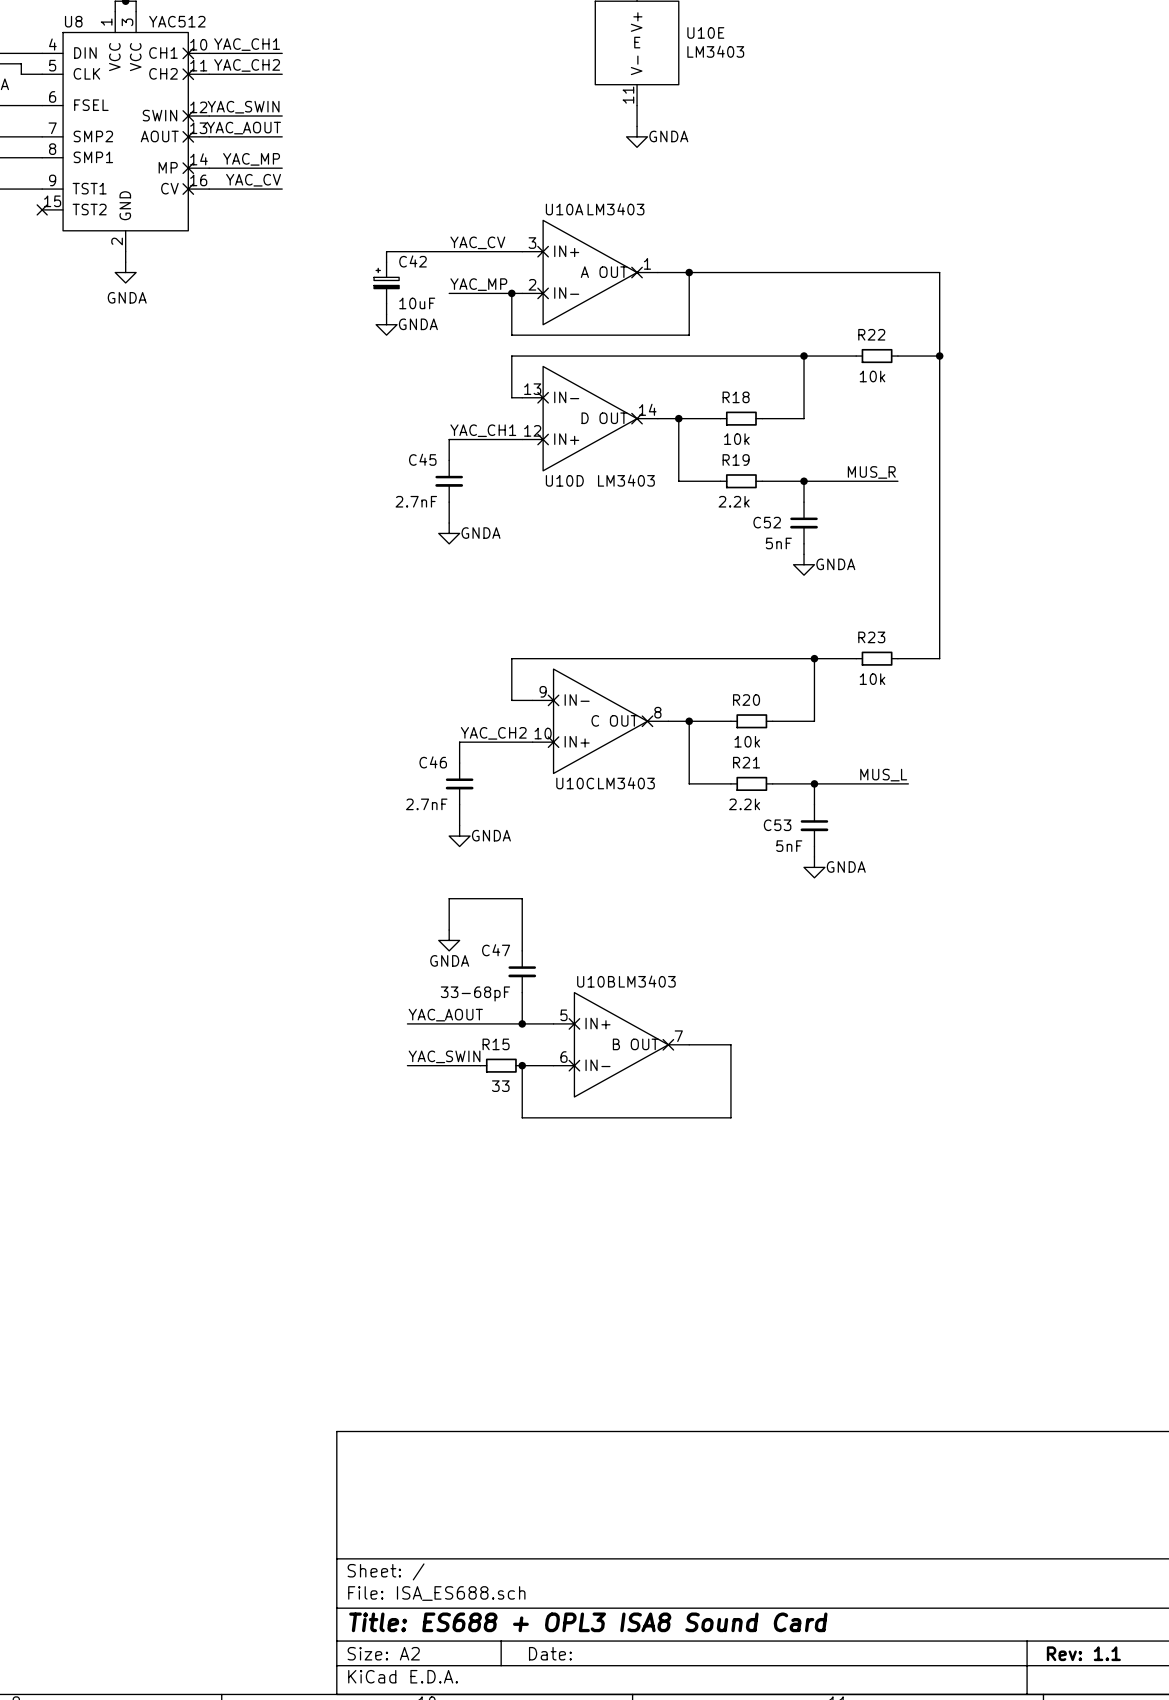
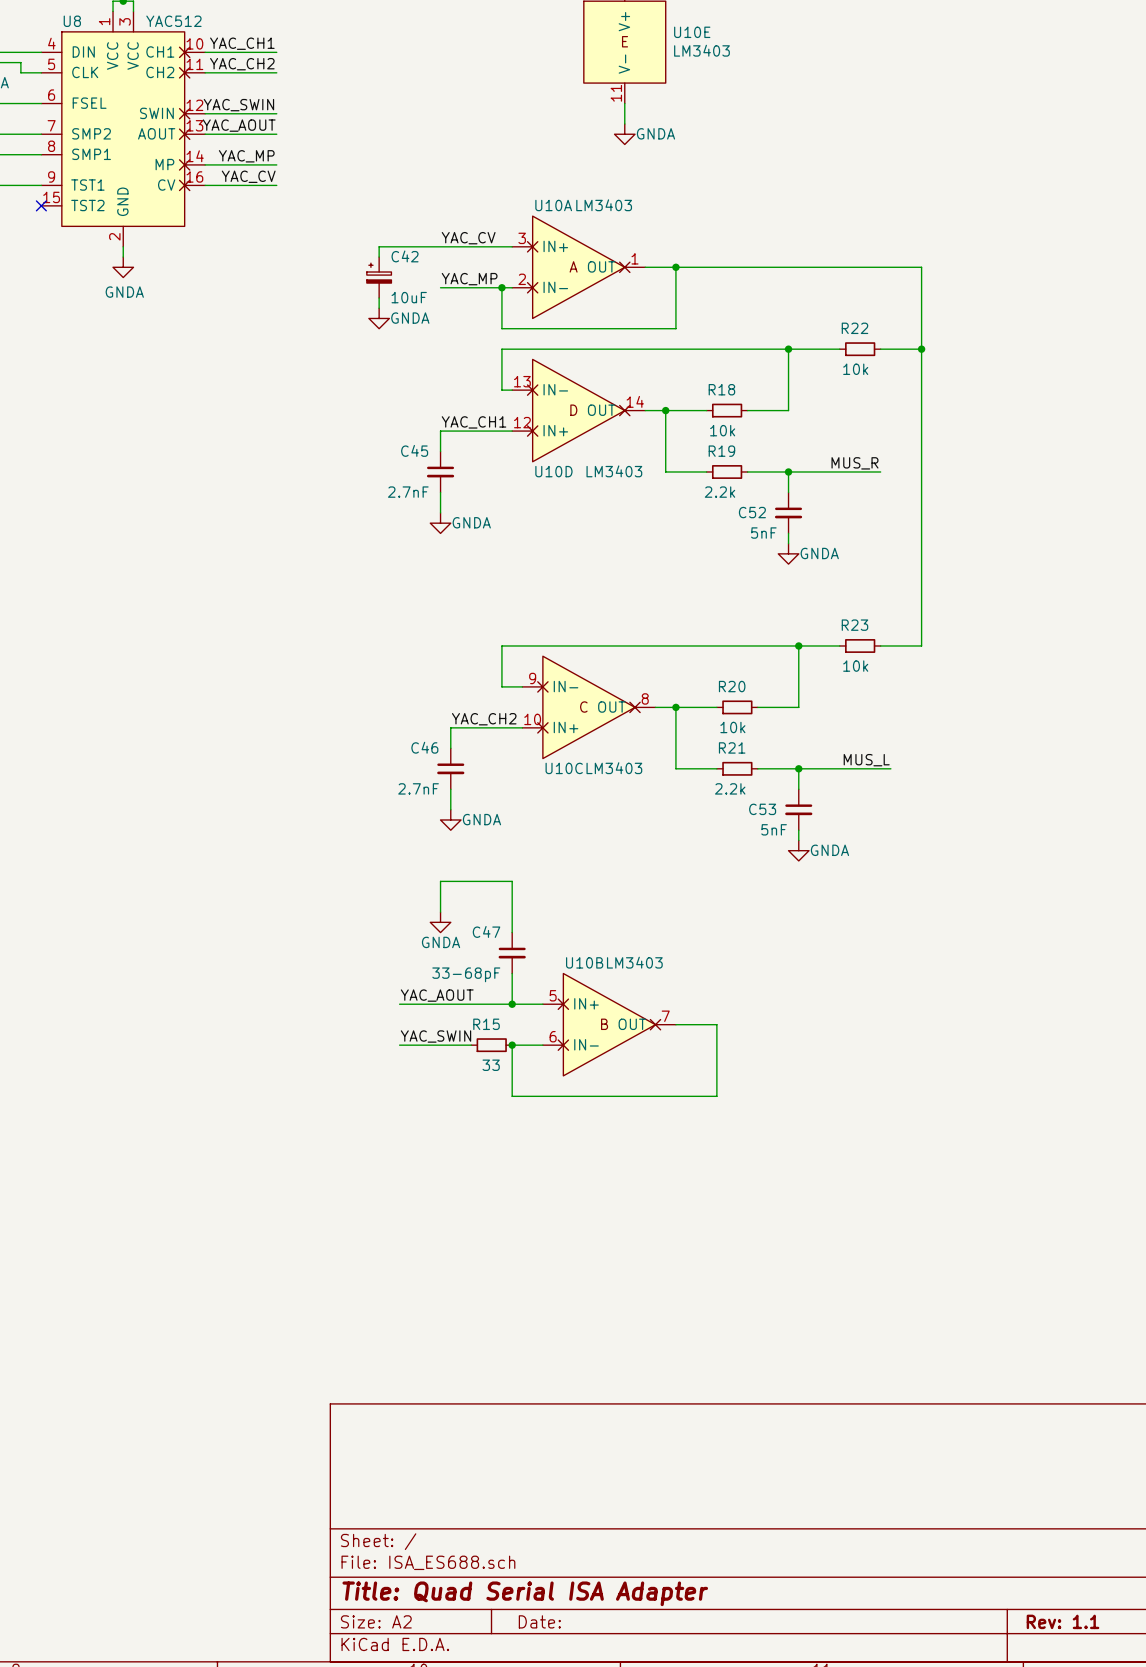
title block: Title: ES688 + OPL3 ISA8 Sound Card (588, 1622) -> Title: Quad Serial ISA Adapter (525, 1593)

